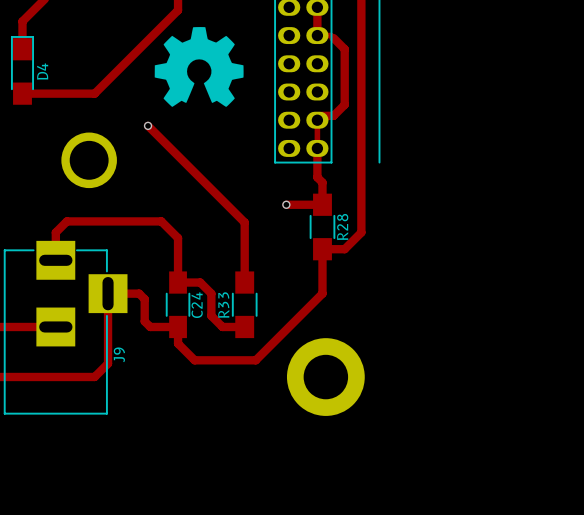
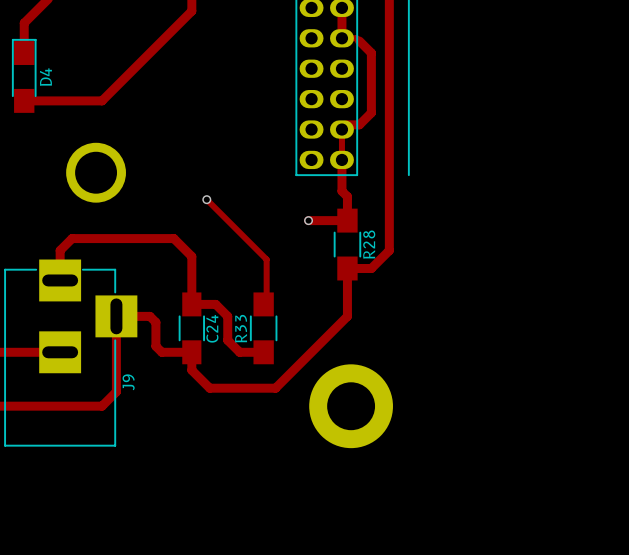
drawing: [154, 27, 244, 107] -> none
track: (148, 125) (244, 222) (244, 282) -> none
via: (148, 125) -> none
track: none -> (206, 199) (266, 259) (266, 301)
via: none -> (206, 199)

